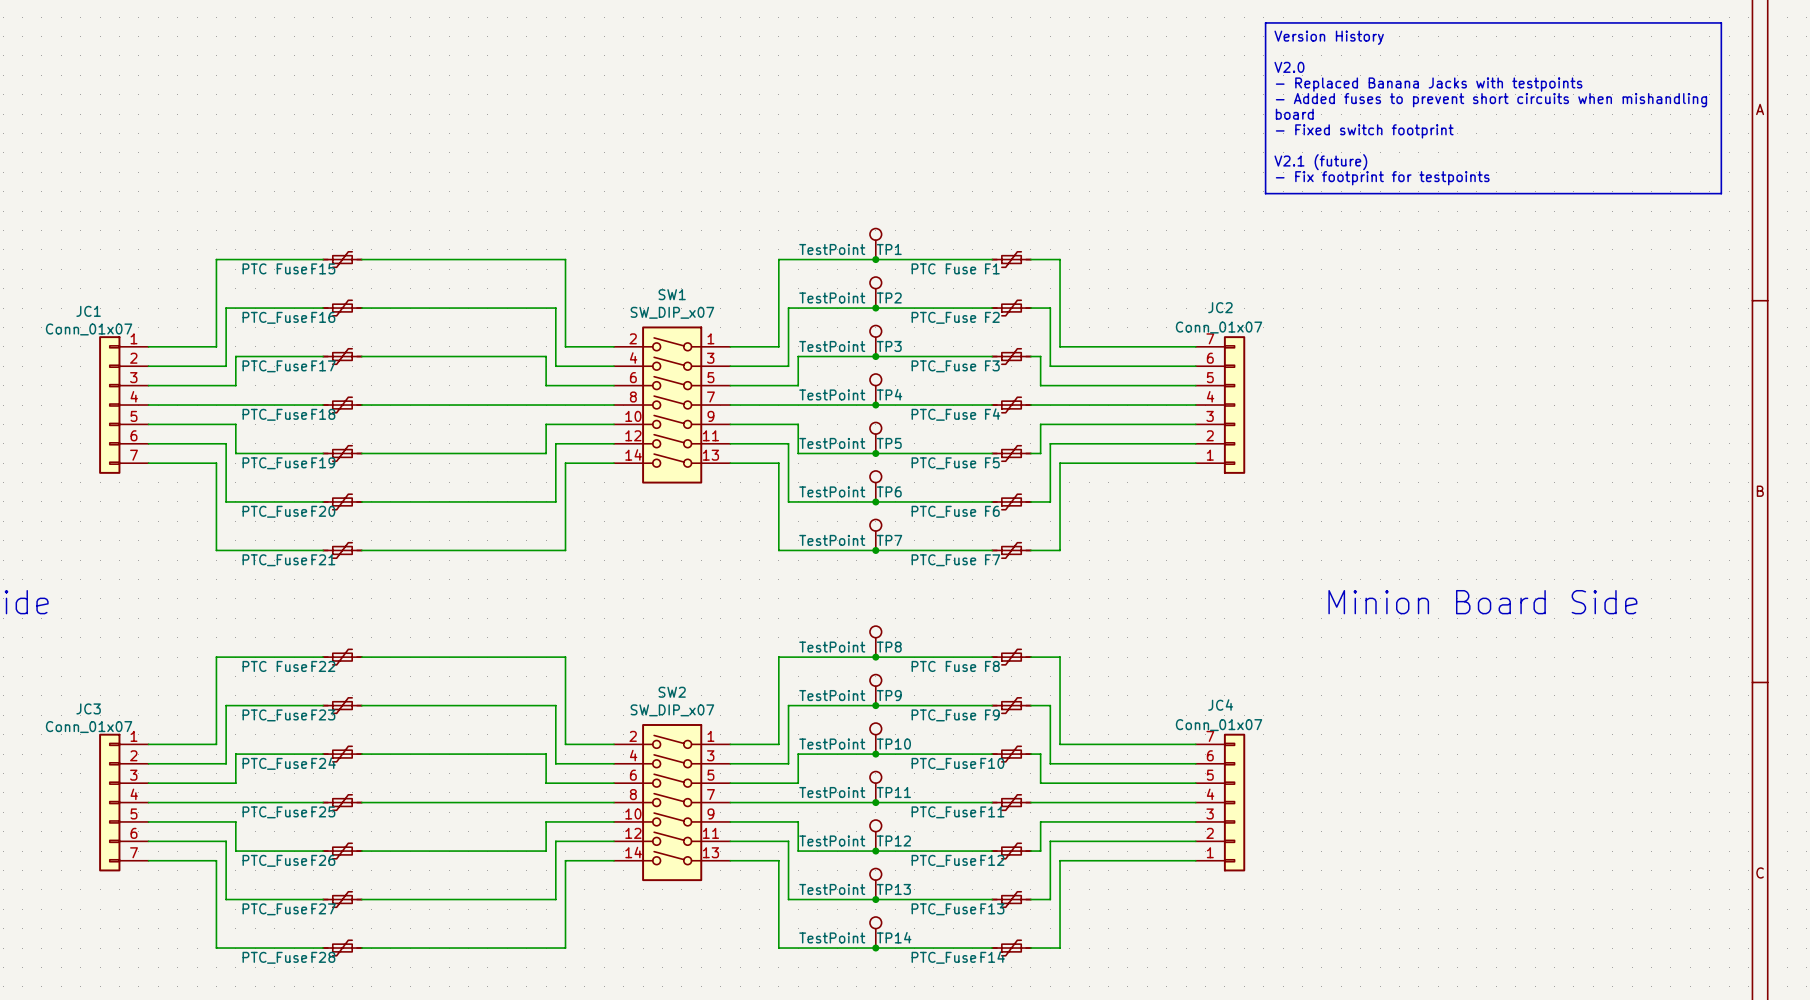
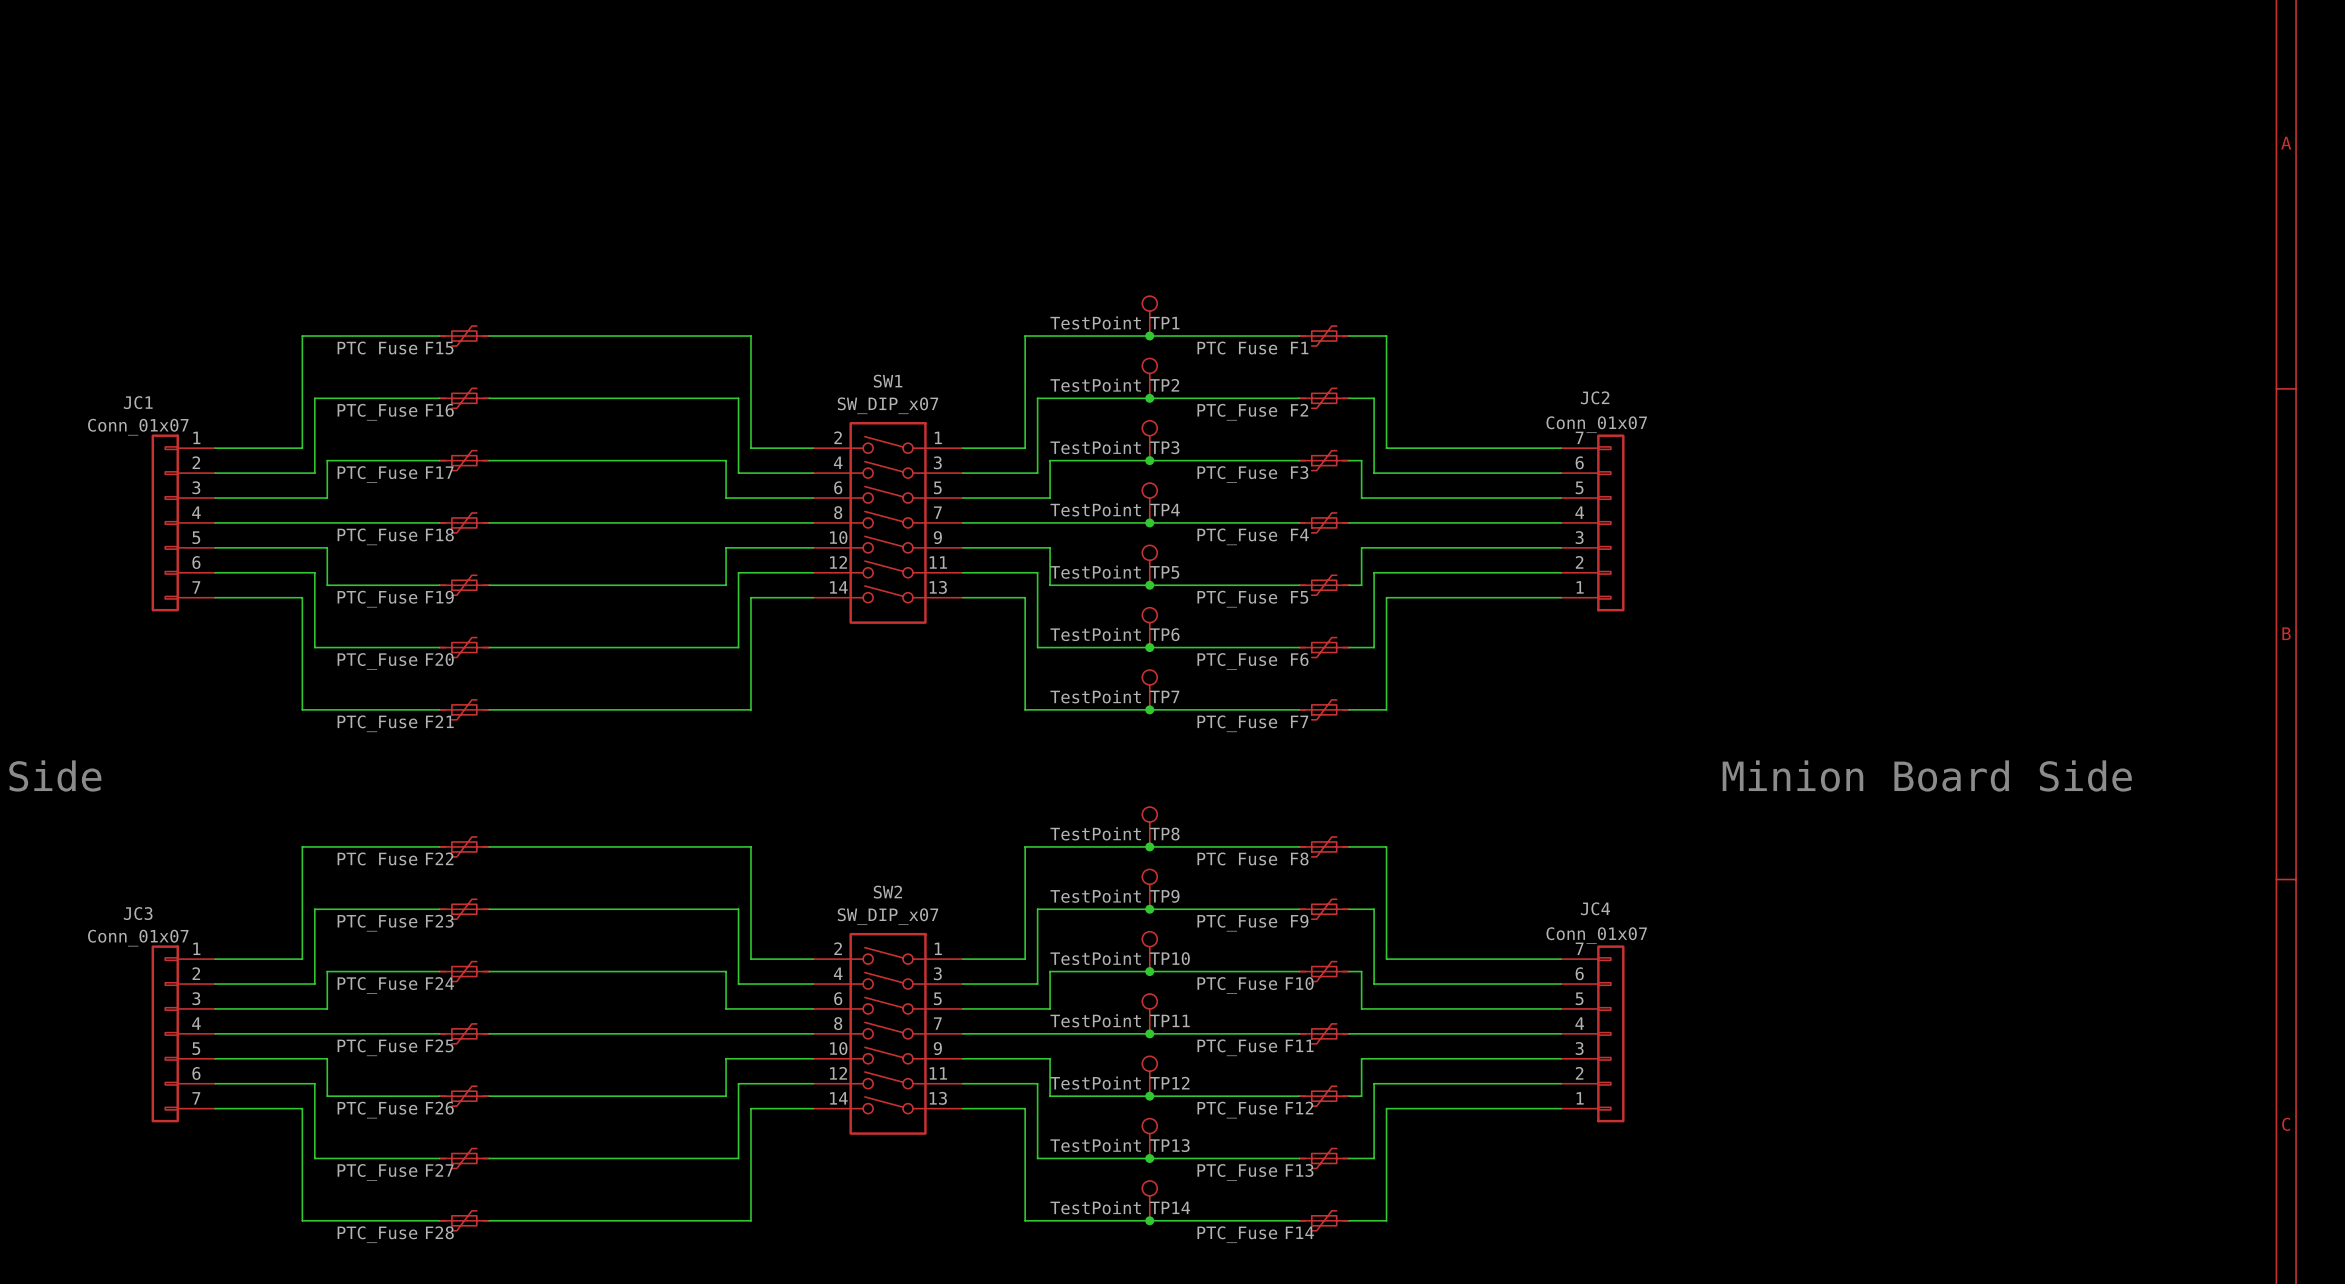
line: (1265, 22) (1721, 22) (1721, 193) (1265, 193) (1265, 22) -> none
text: Version History (1329, 37) -> none
text: V2.0 (1289, 67) -> none
text: - Replaced Banana Jacks with testpoints (1429, 84) -> none
text: - Added fuses to prevent short circuits when mishandling (1491, 100) -> none
text: board (1294, 114) -> none
text: - Fixed switch footprint (1364, 131) -> none
text: V2.1 (future) (1320, 162) -> none
text: - Fix footprint for testpoints (1382, 178) -> none

